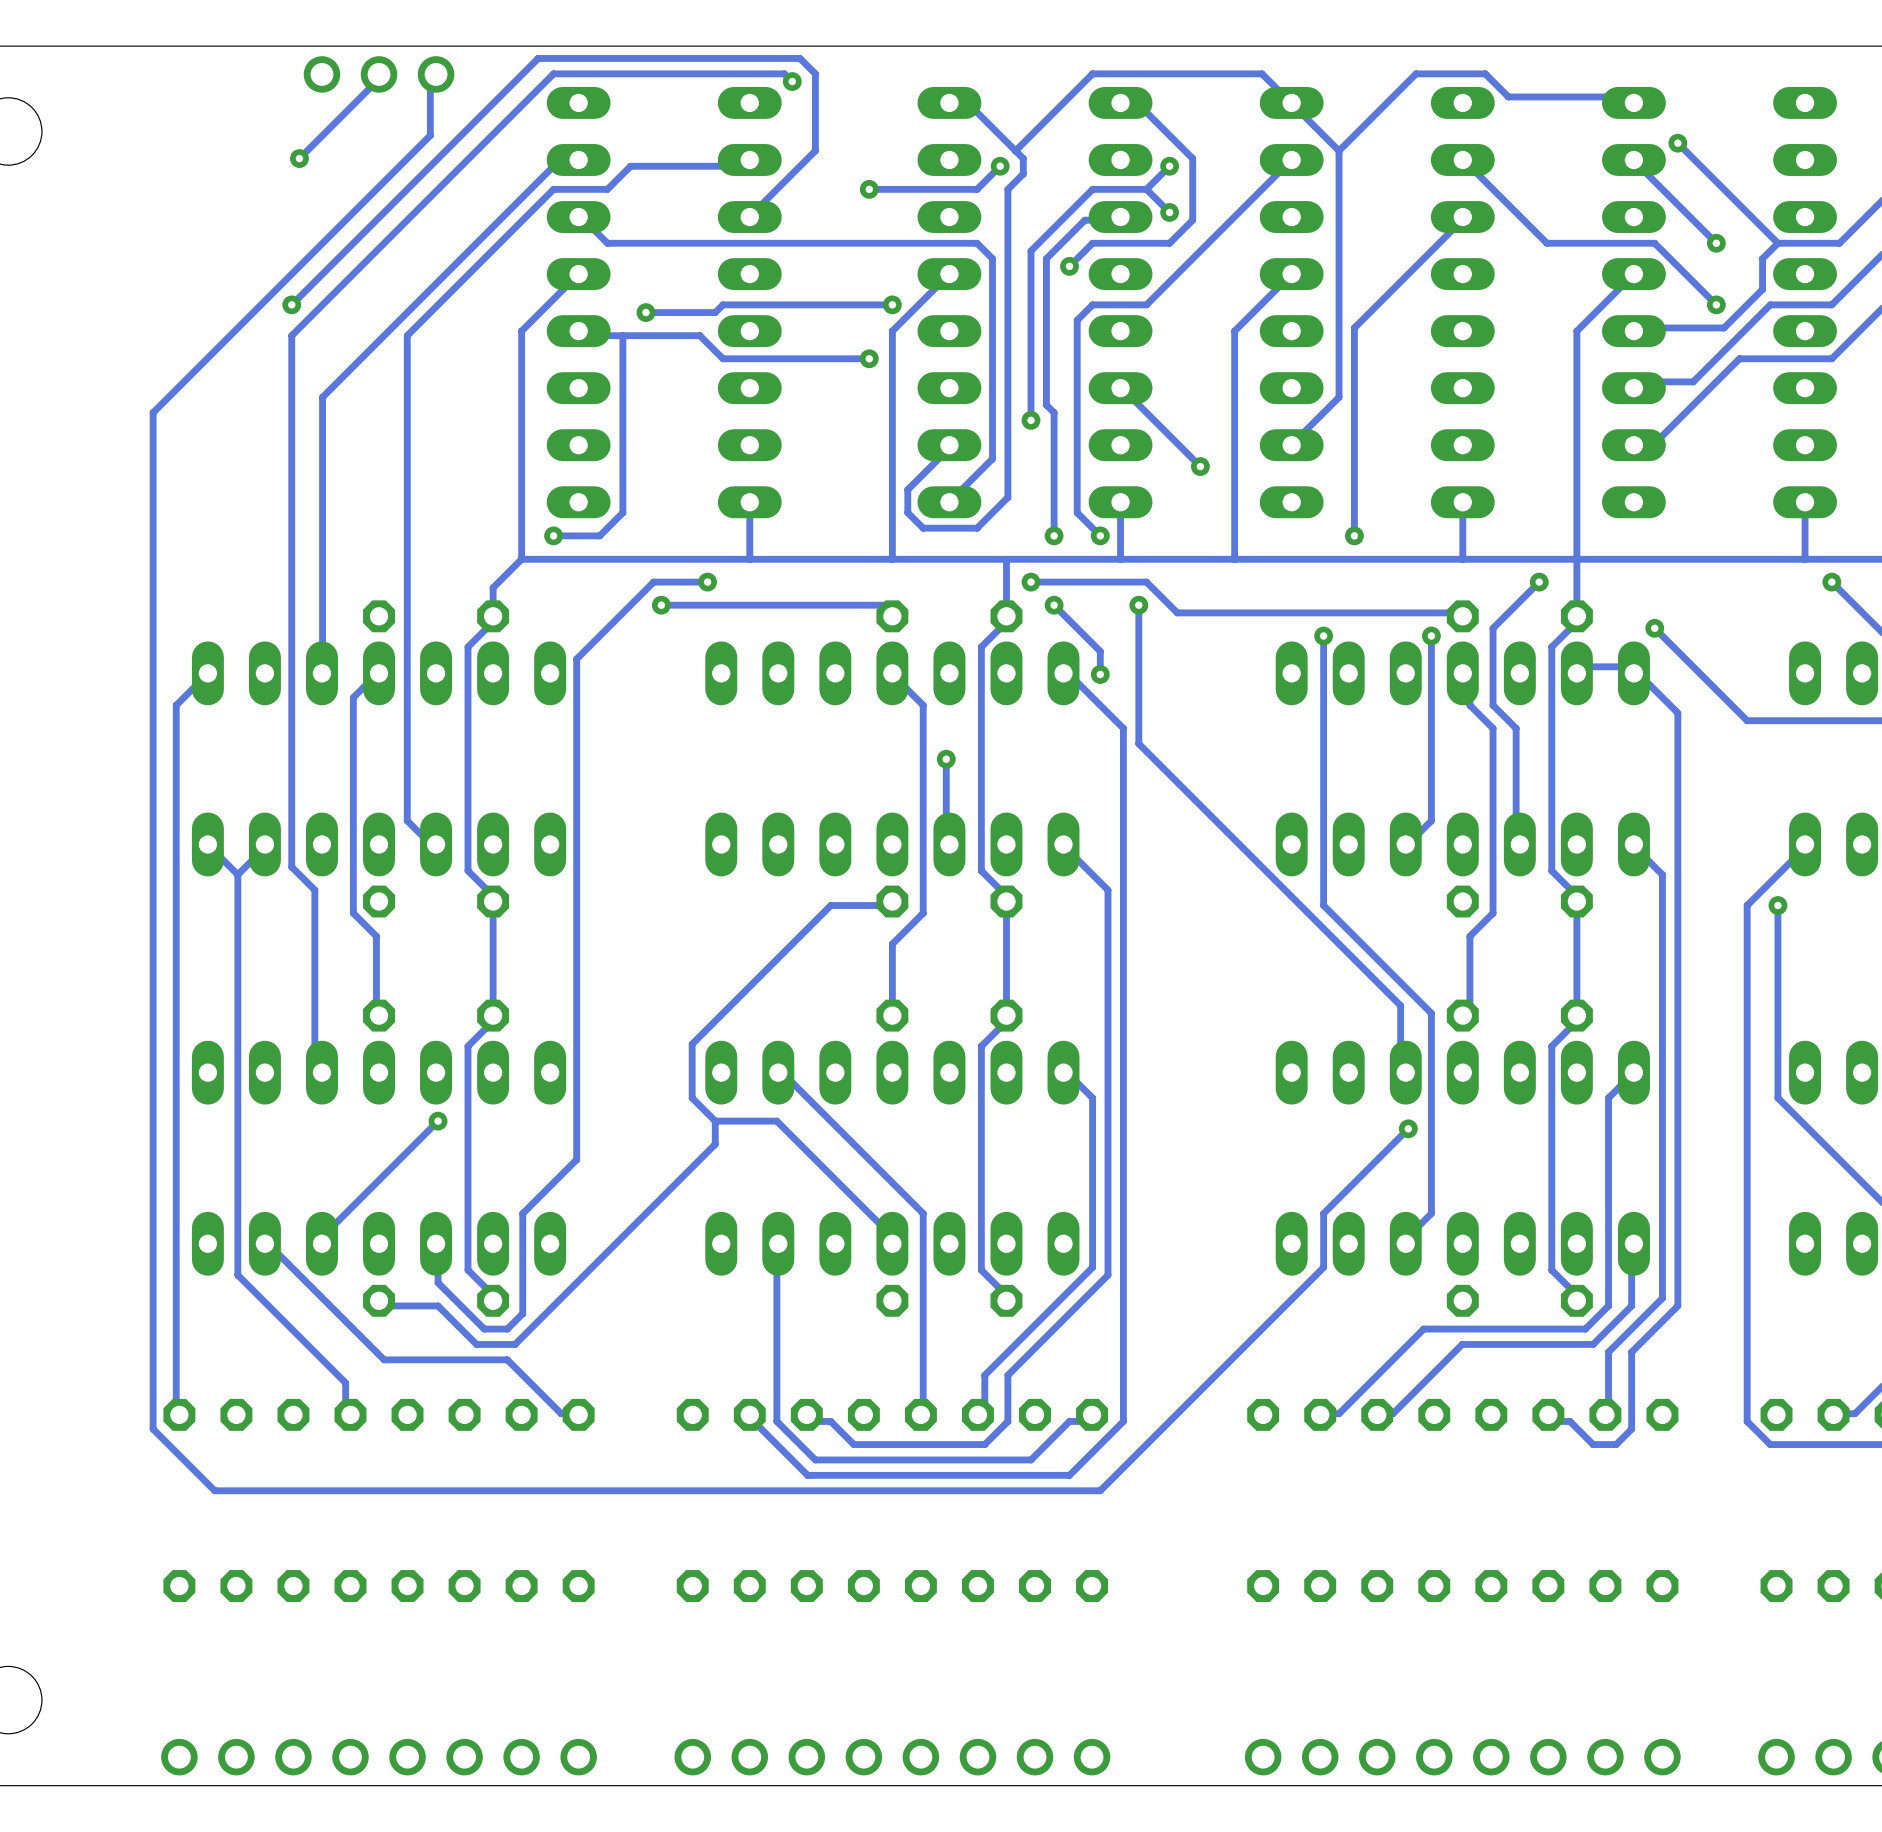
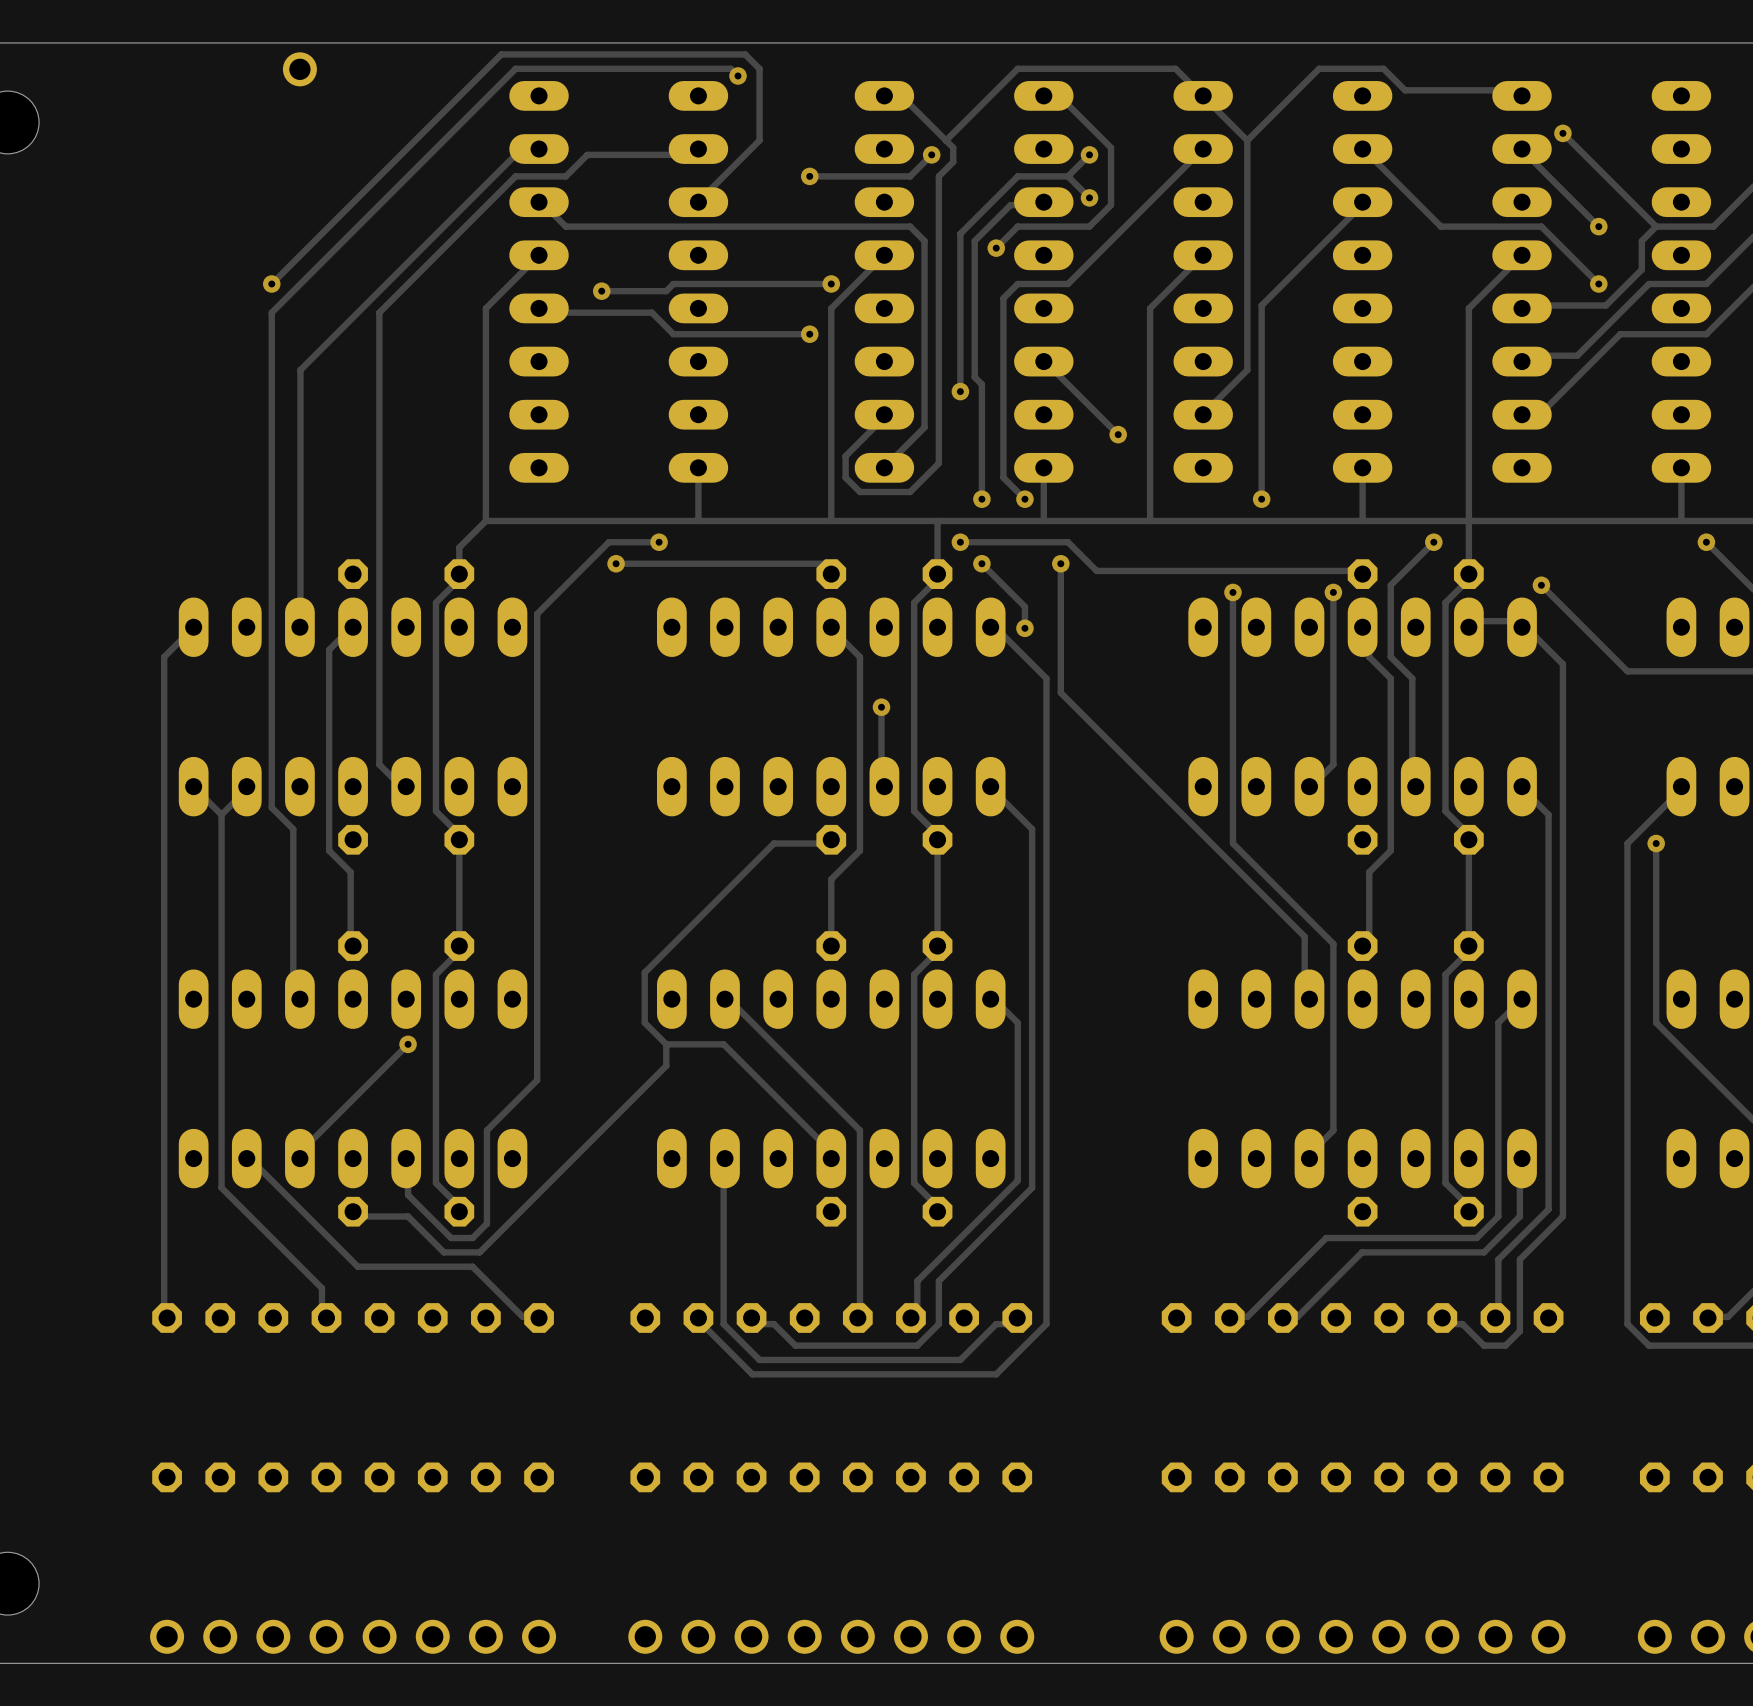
track: (379, 74) (376, 81) (299, 158) -> none
part: (379, 74) -> none
track: (436, 74) (430, 81) (430, 135) (153, 412) (153, 1429) (214, 1490) (1100, 1490) (1323, 1267) (1323, 1213) (1408, 1128) -> none
part: (436, 74) -> none
via: (299, 158) -> none
track: (622, 335) (622, 512) (599, 535) (553, 535) -> none
via: (553, 535) -> none
via: (1408, 1128) -> none

